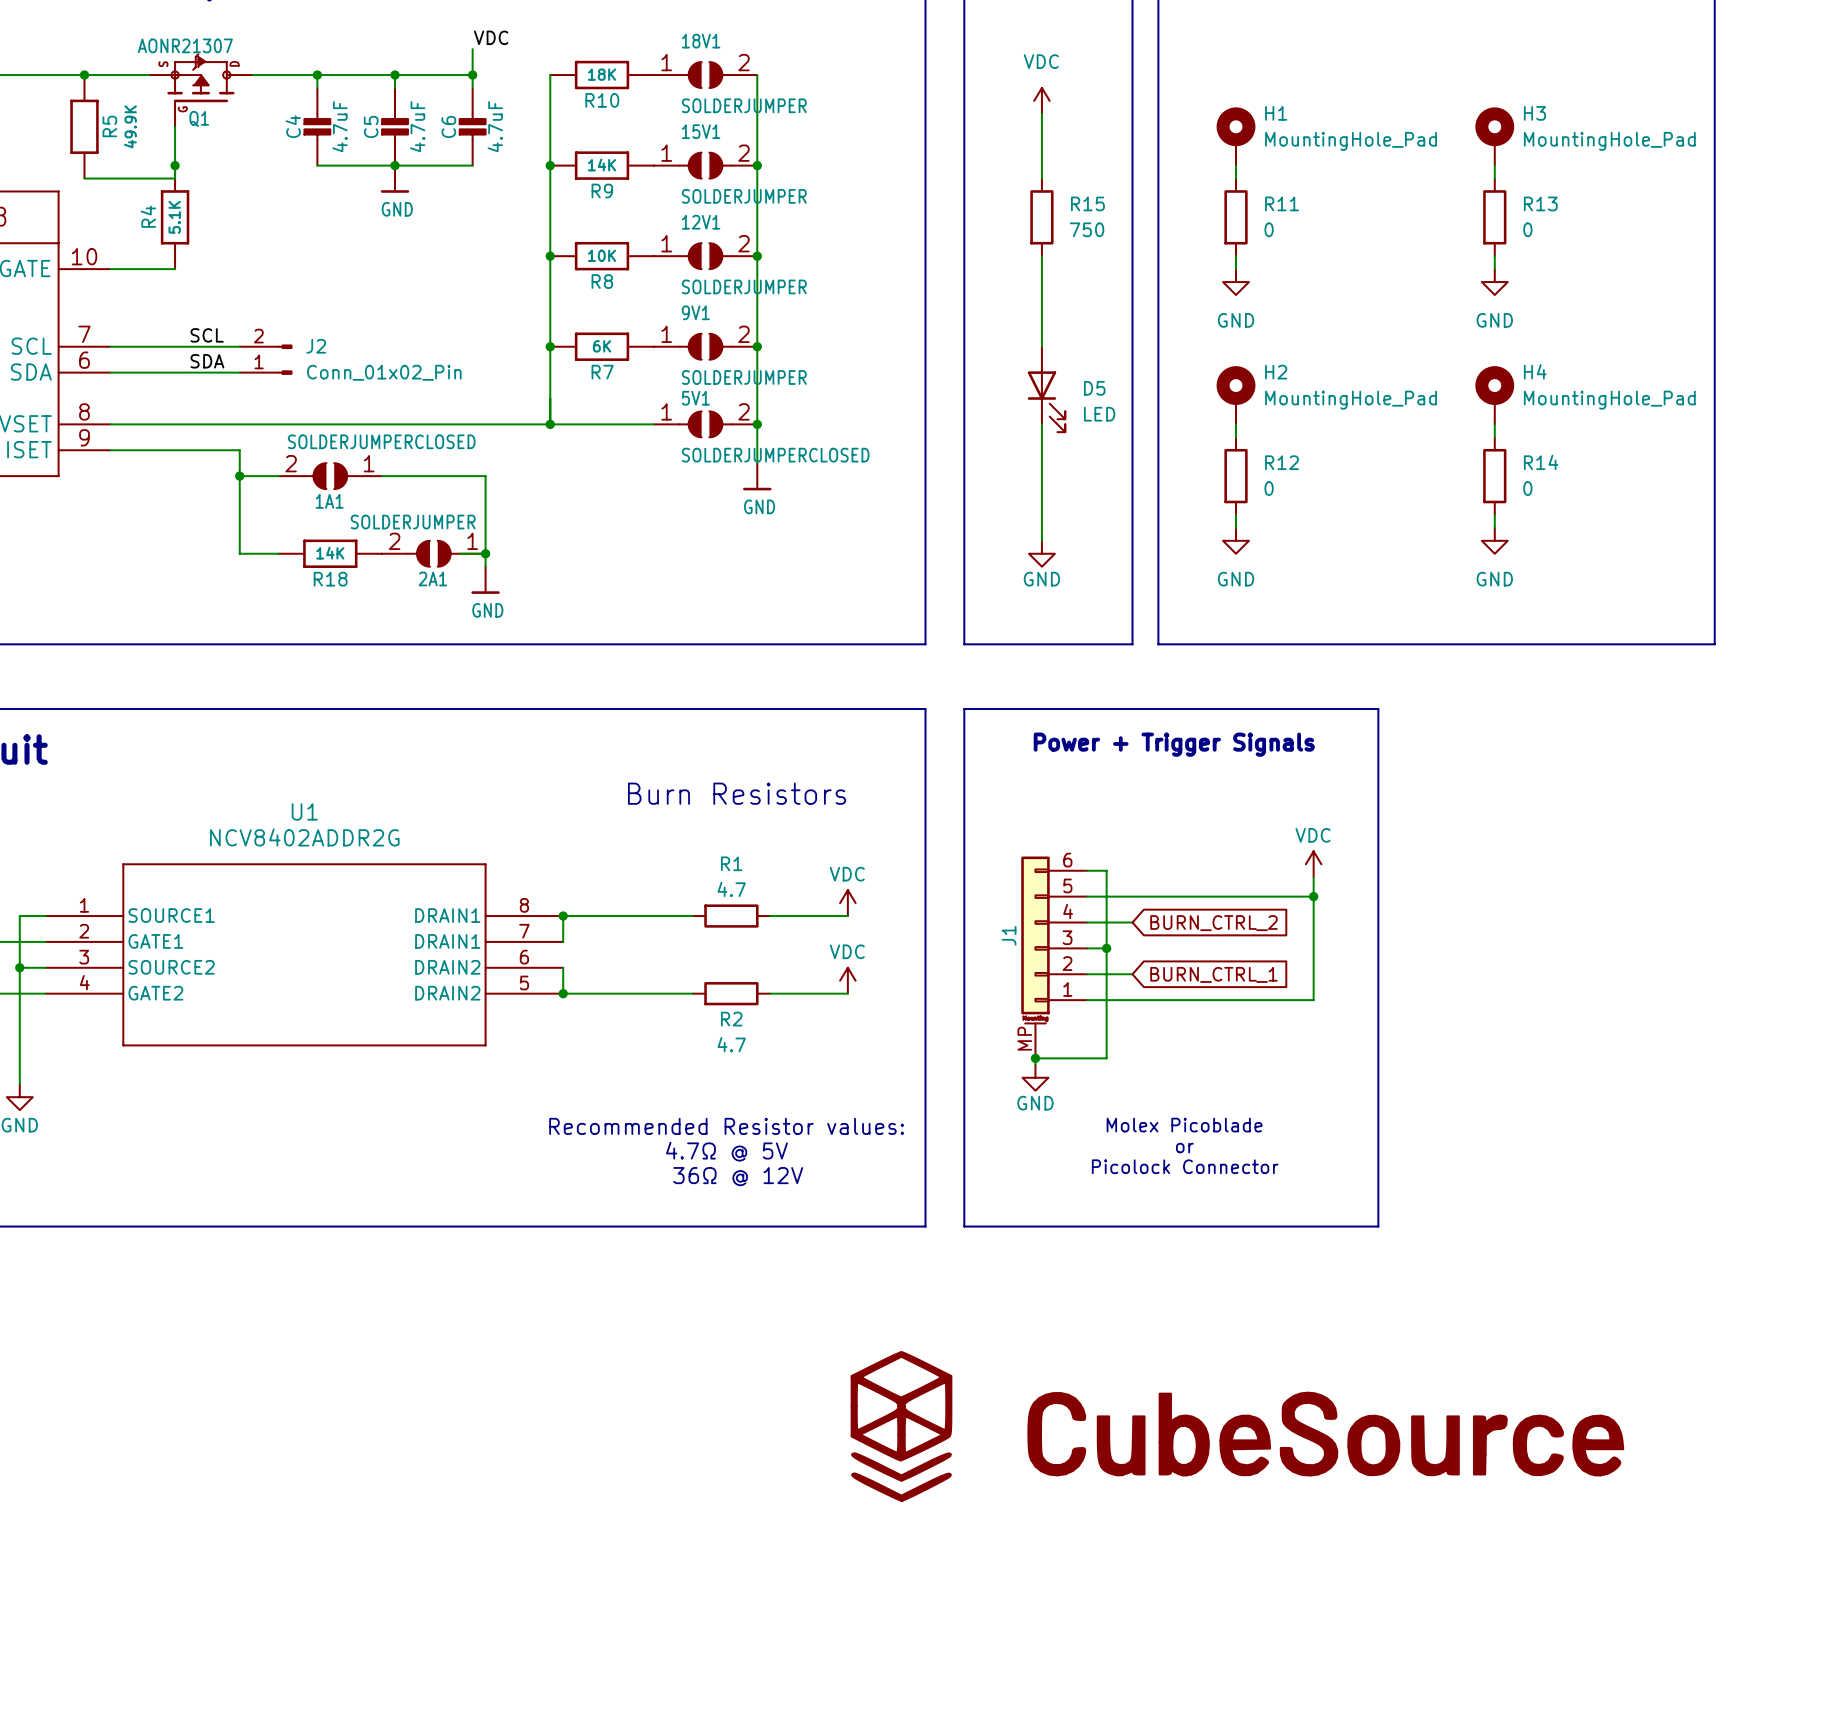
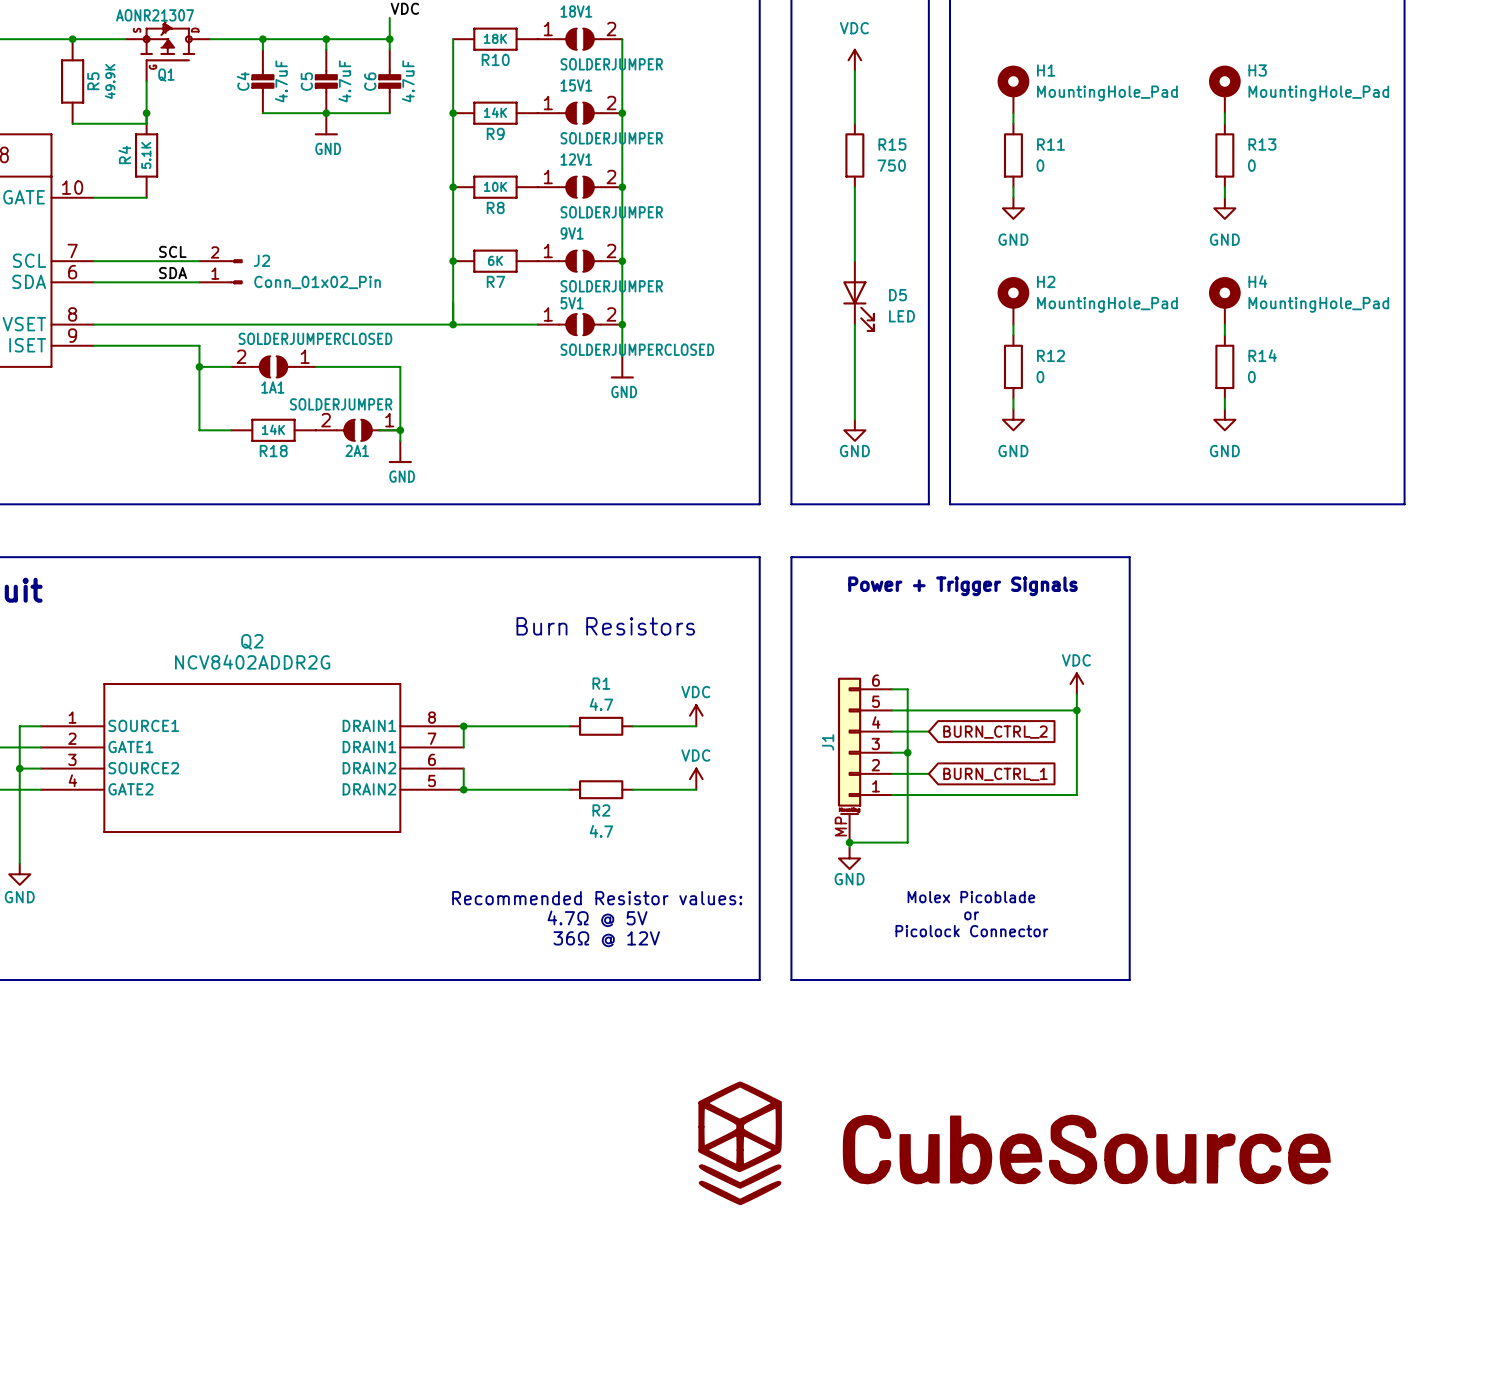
U1 name: U1 (304, 811) -> Q2 (252, 641)

